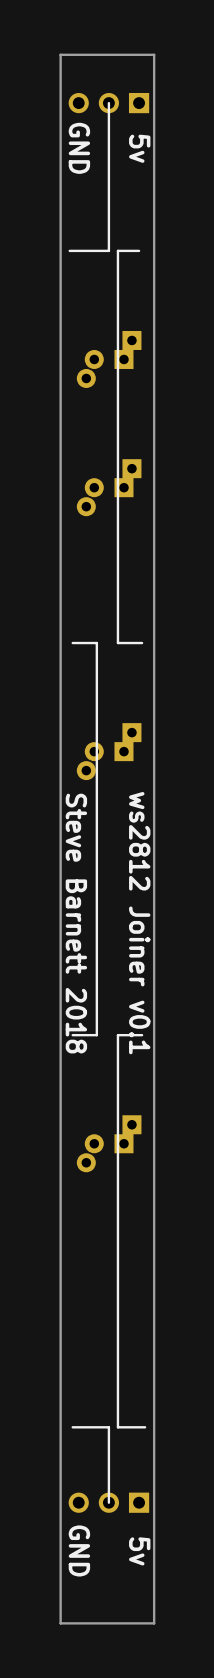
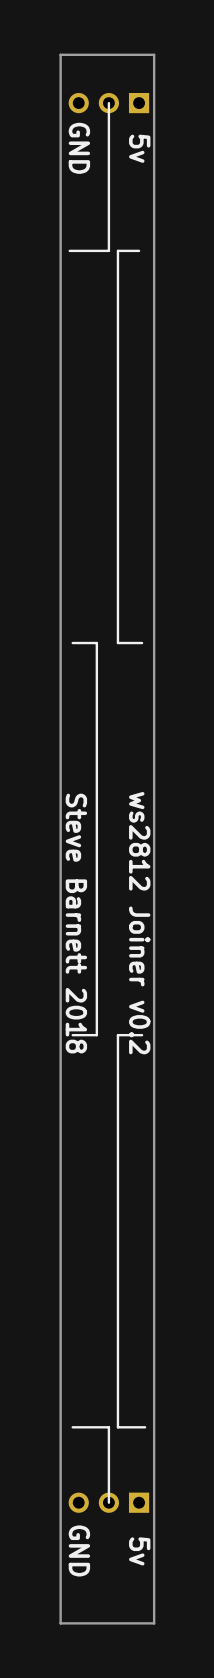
part: (109, 359) -> none
part: (109, 487) -> none
part: (109, 751) -> none
text: ws2812 Joiner v0.1 (139, 923) -> ws2812 Joiner v0.2 (139, 923)
part: (109, 1143) -> none

